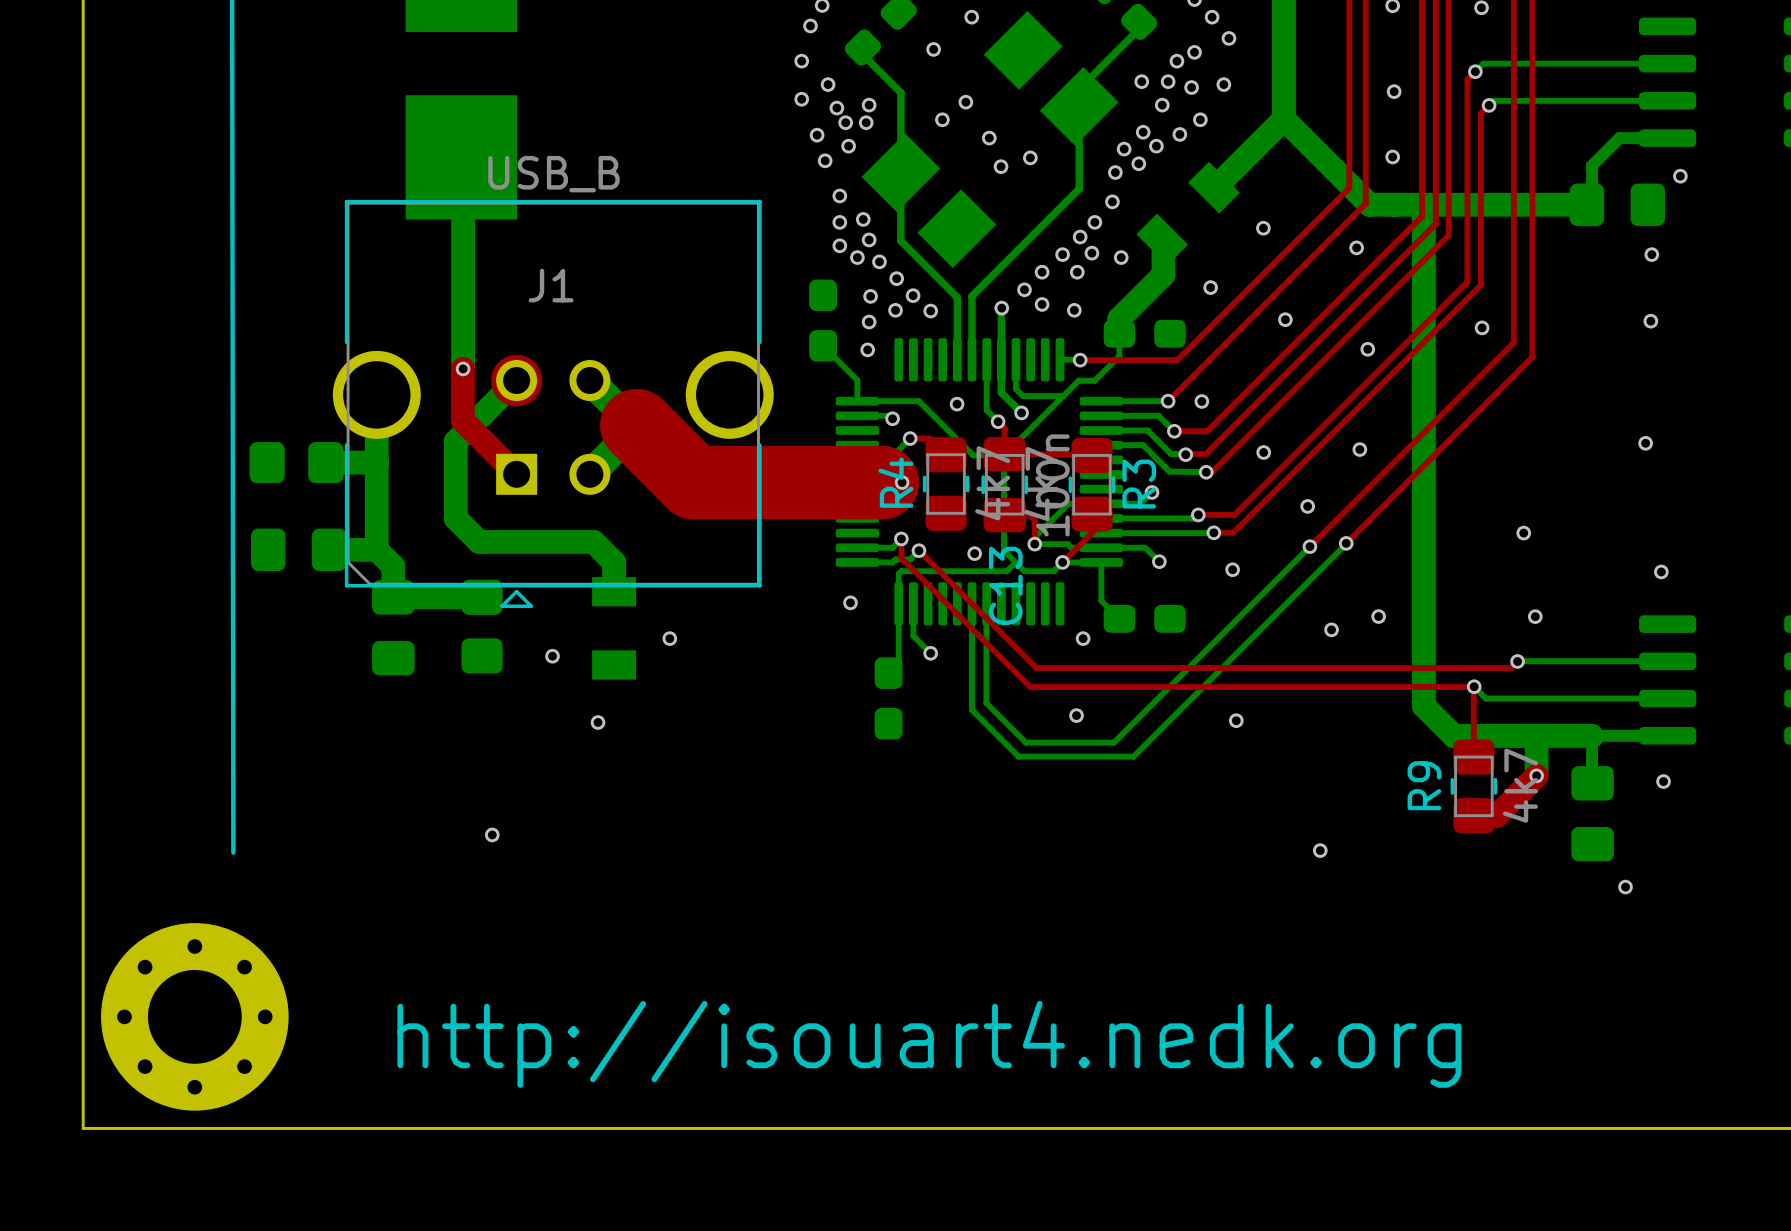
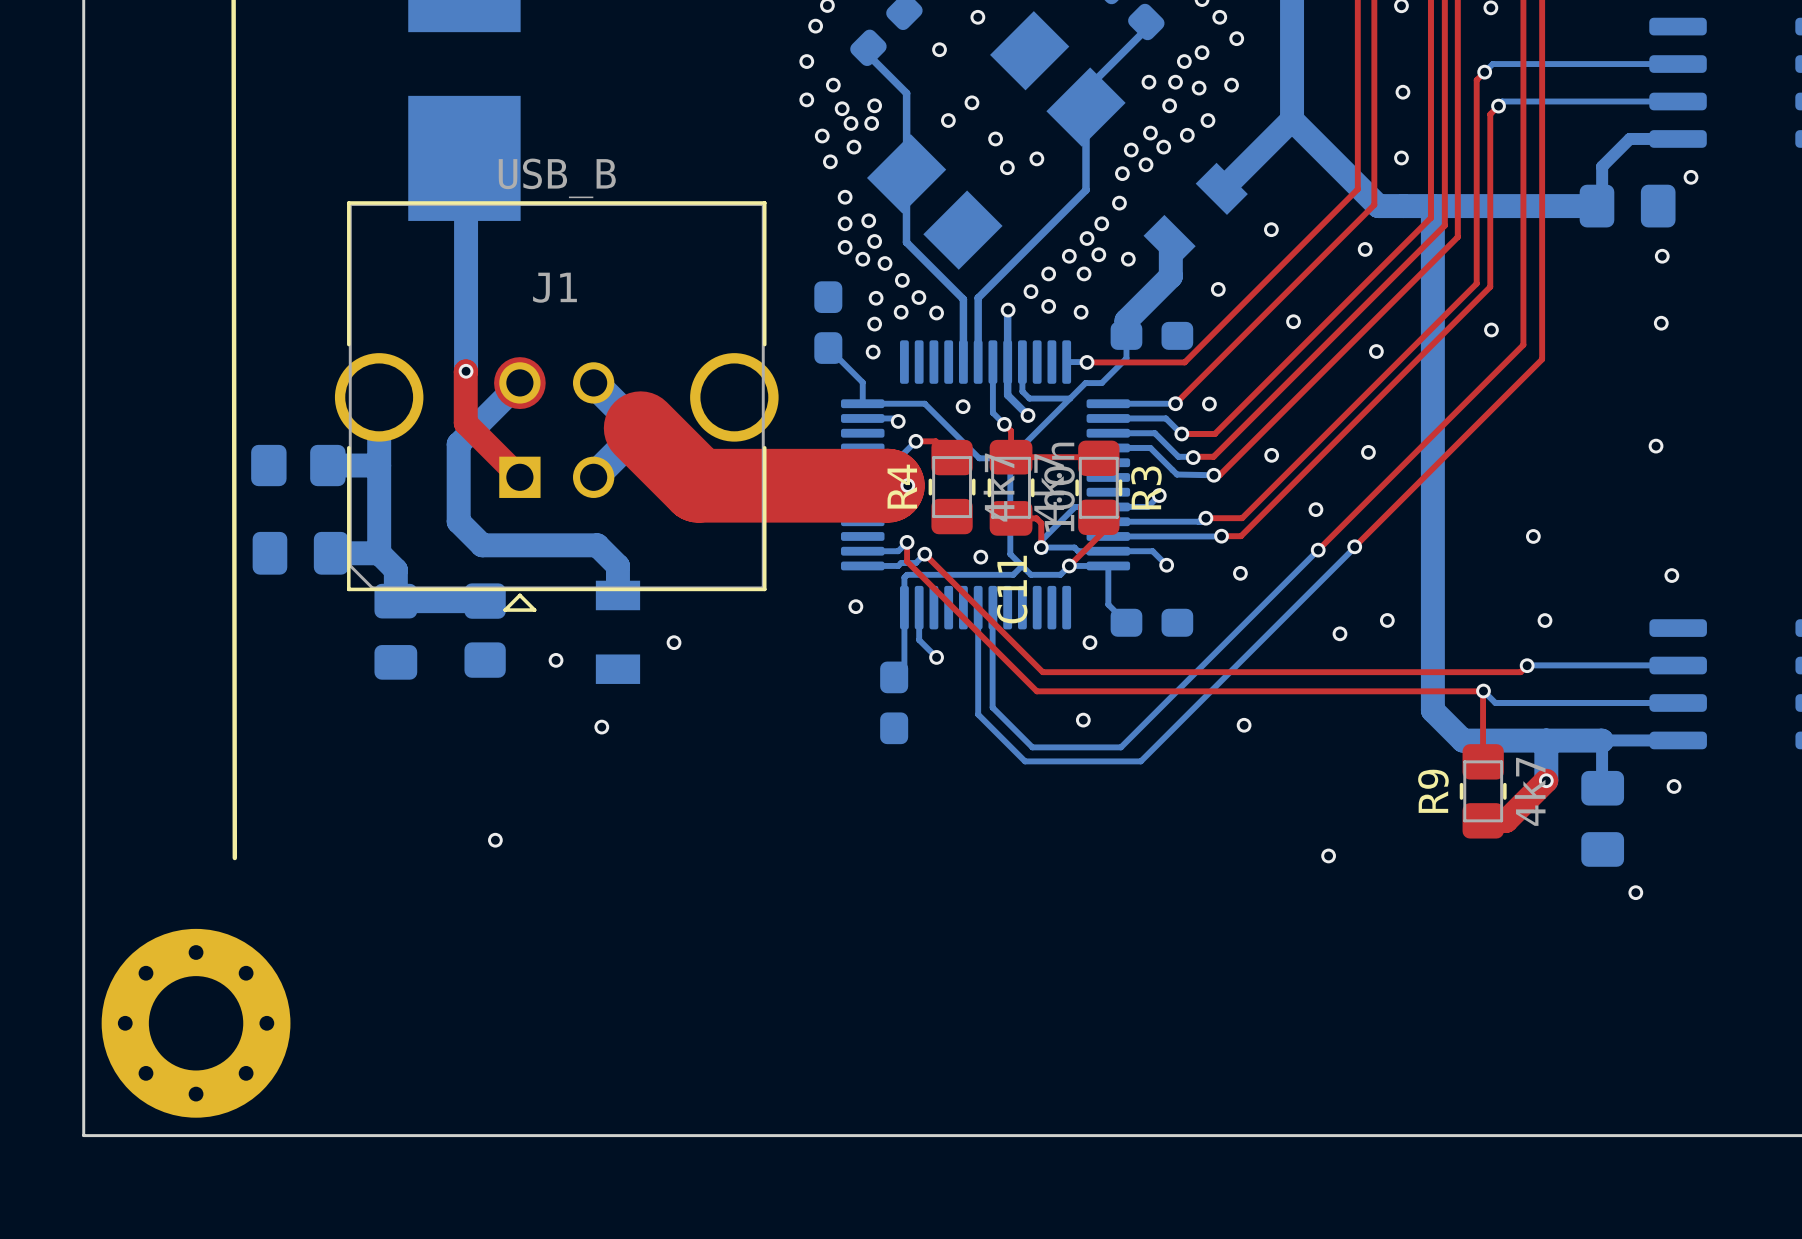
C13 name: C13 (1005, 585) -> C11 (1012, 589)
text: http://isouart4.nedk.org (929, 1044) -> none

